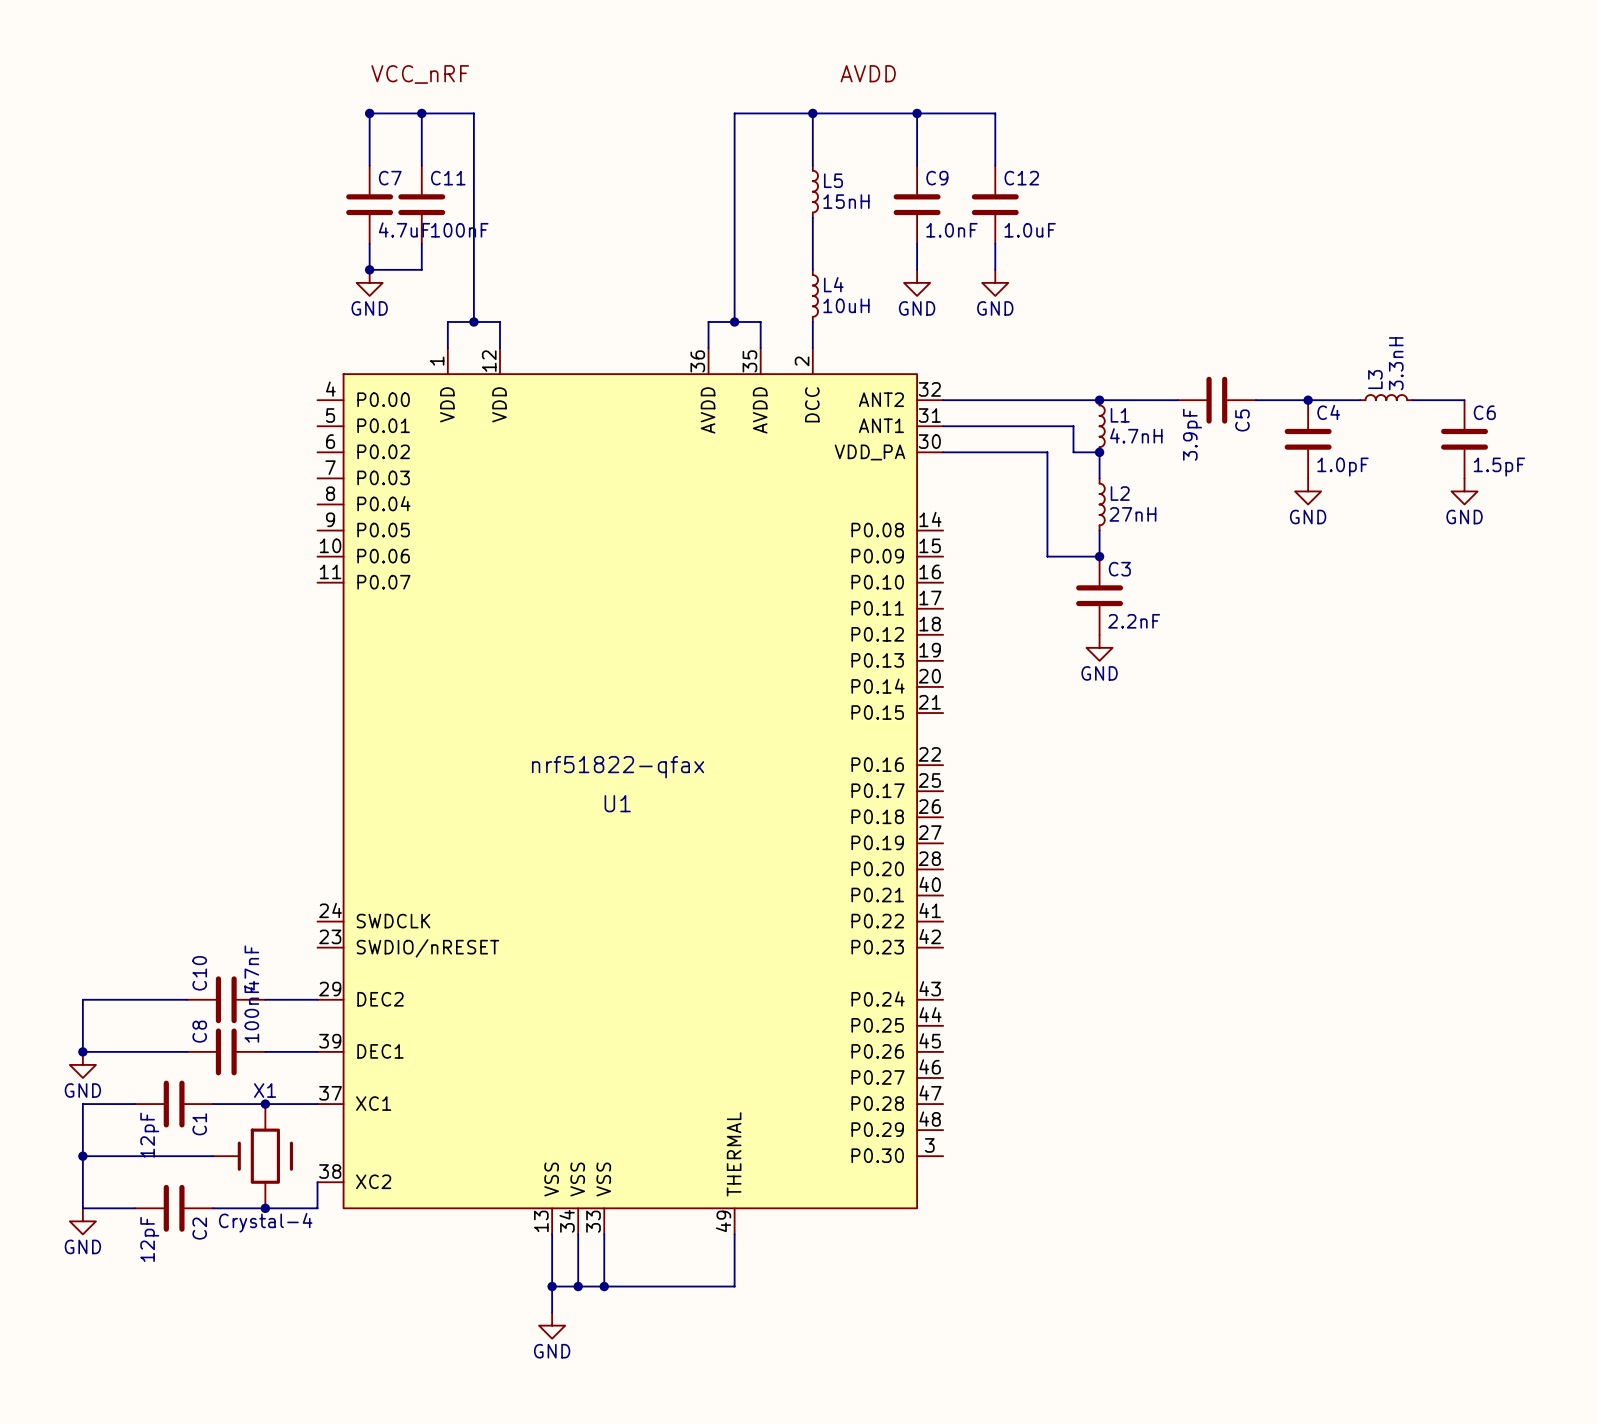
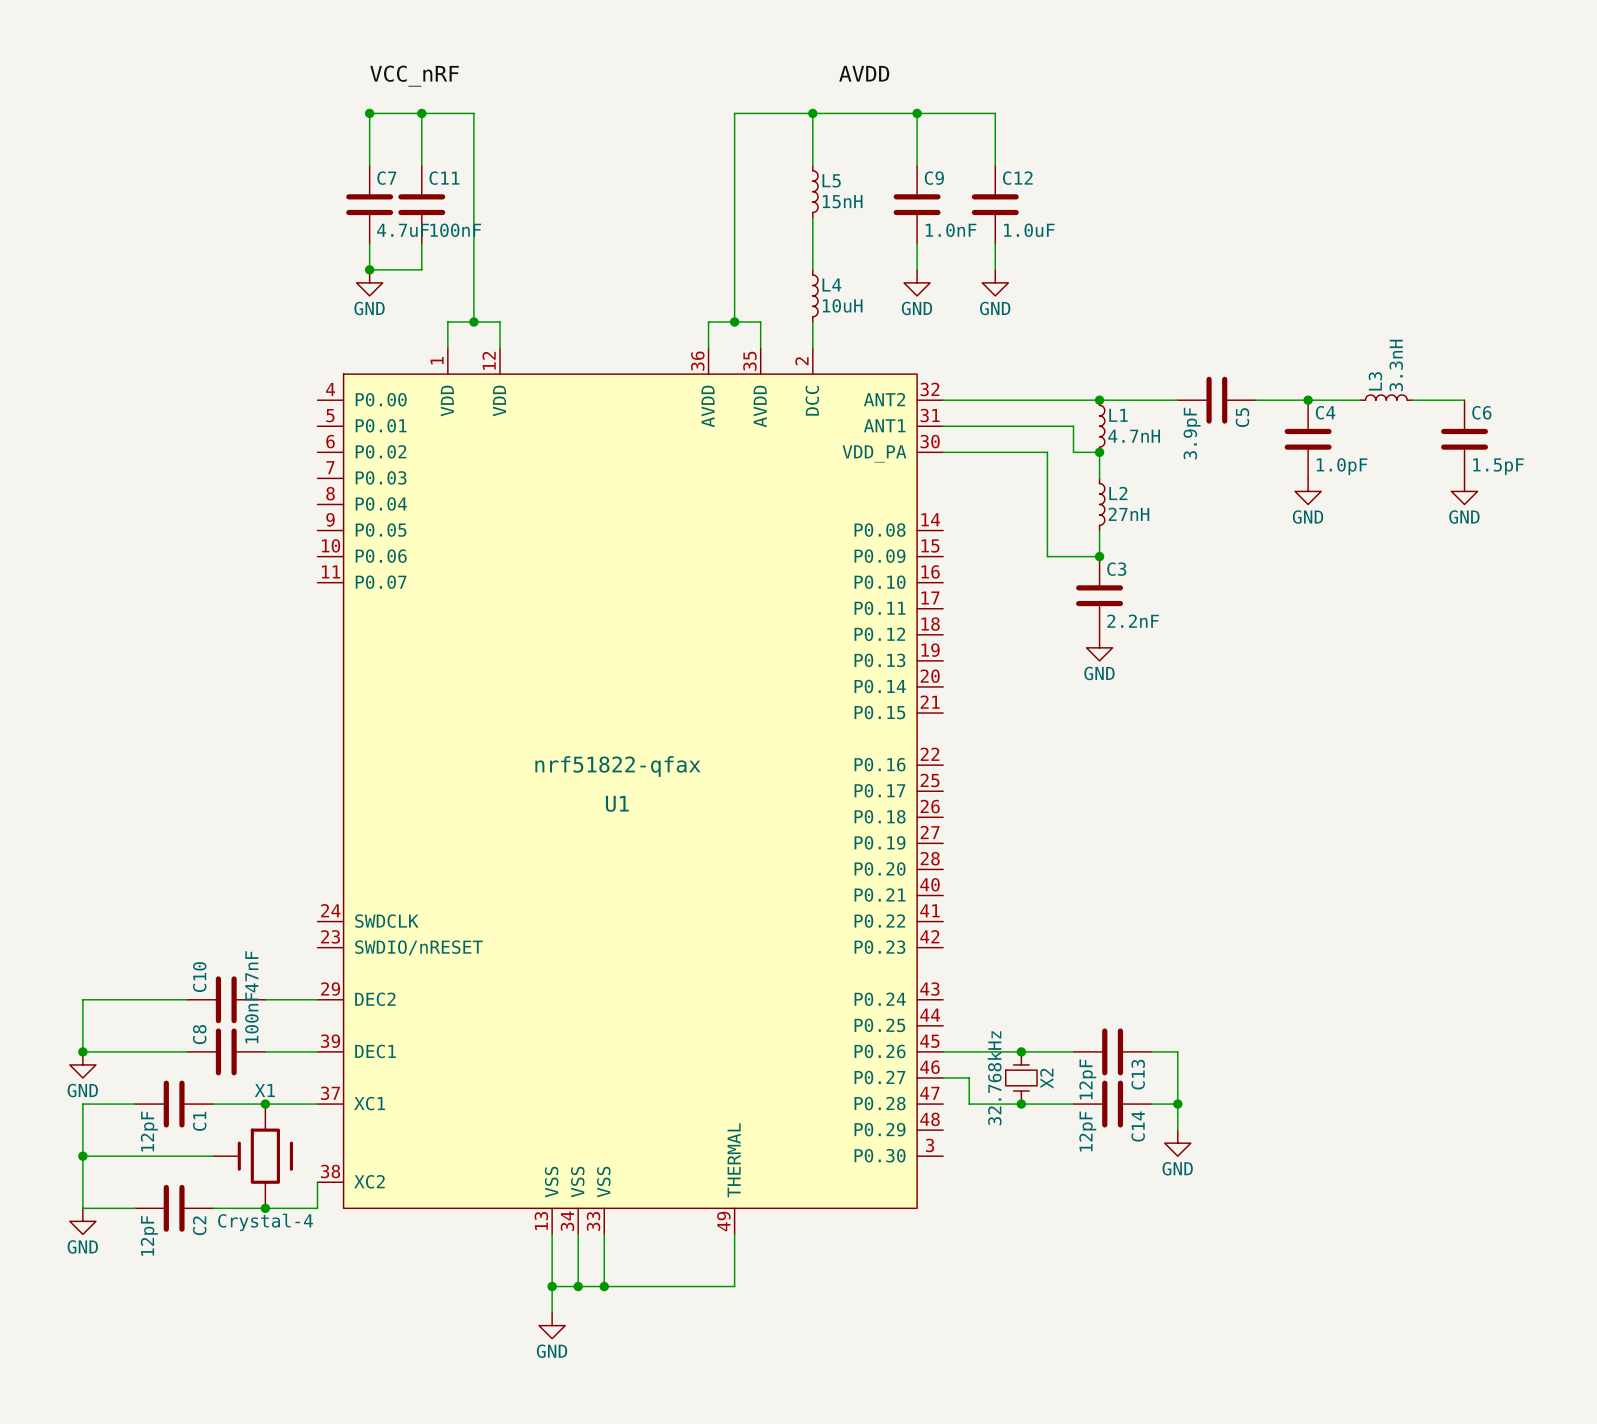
wire: none -> (943, 1051) (1073, 1051)
junction: none -> (1021, 1051)
C13: none -> 12pF (1112, 1051)
wire: none -> (1151, 1051) (1177, 1051) (1177, 1130)
wire: none -> (943, 1077) (969, 1077) (969, 1104) (1073, 1104)
X2: none -> 32.768kHz (1021, 1077)
junction: none -> (1021, 1104)
C14: none -> 12pF (1112, 1104)
wire: none -> (1151, 1104) (1177, 1104)
junction: none -> (1177, 1104)
power symbol: none -> GND (1177, 1143)

